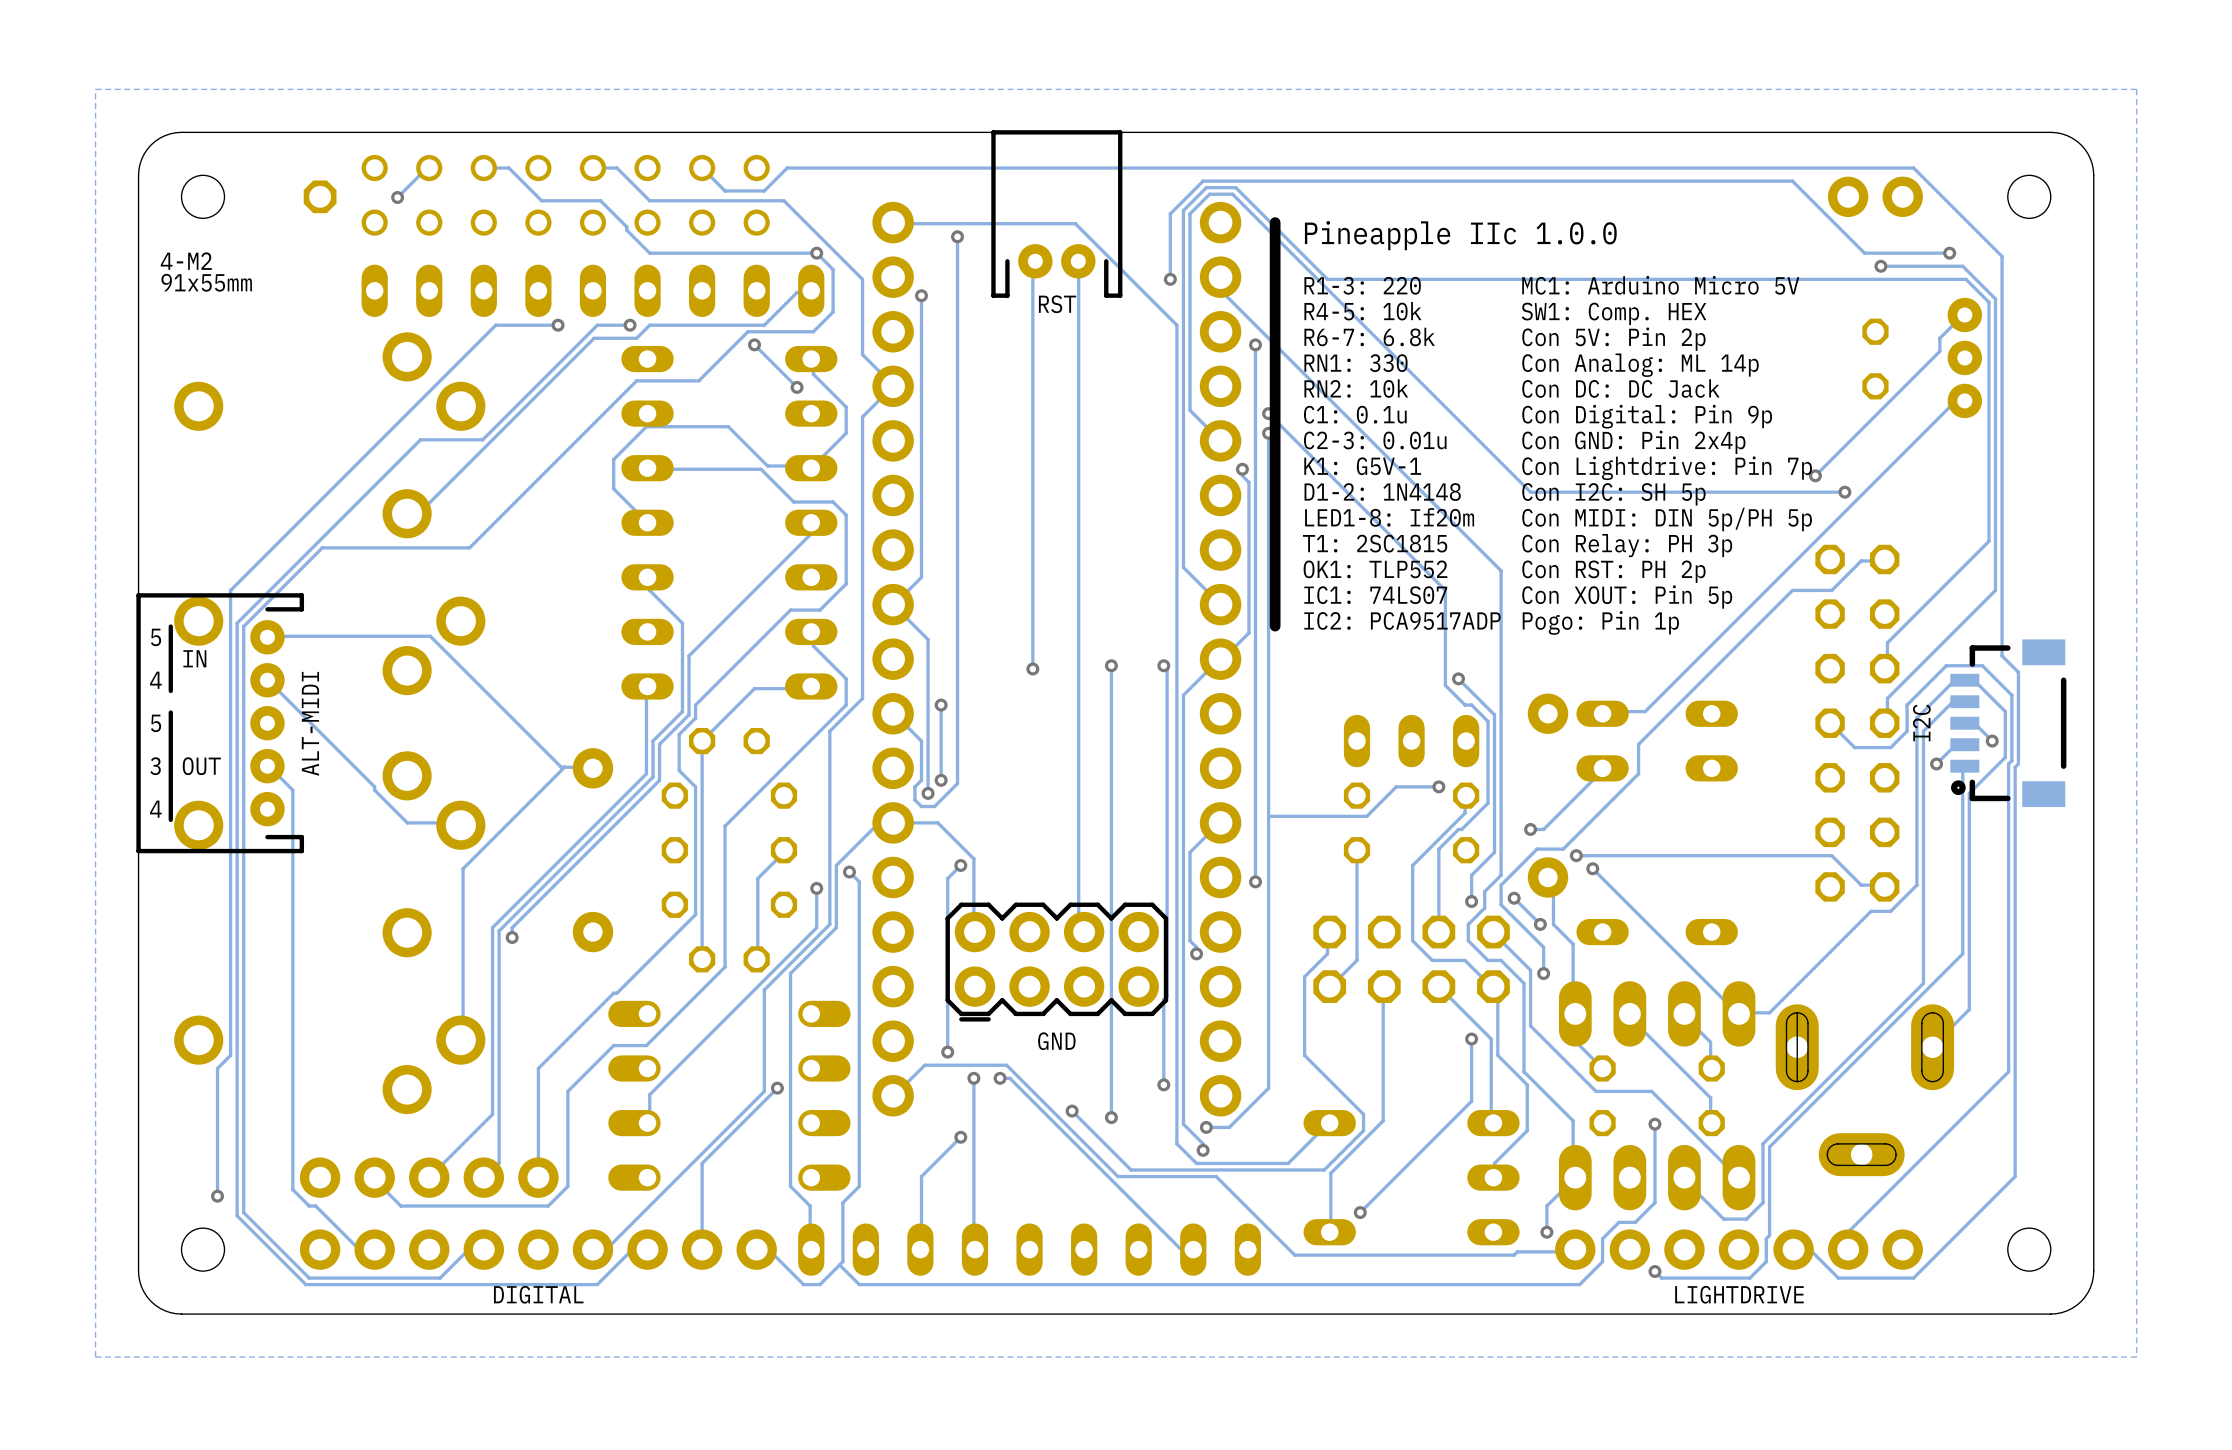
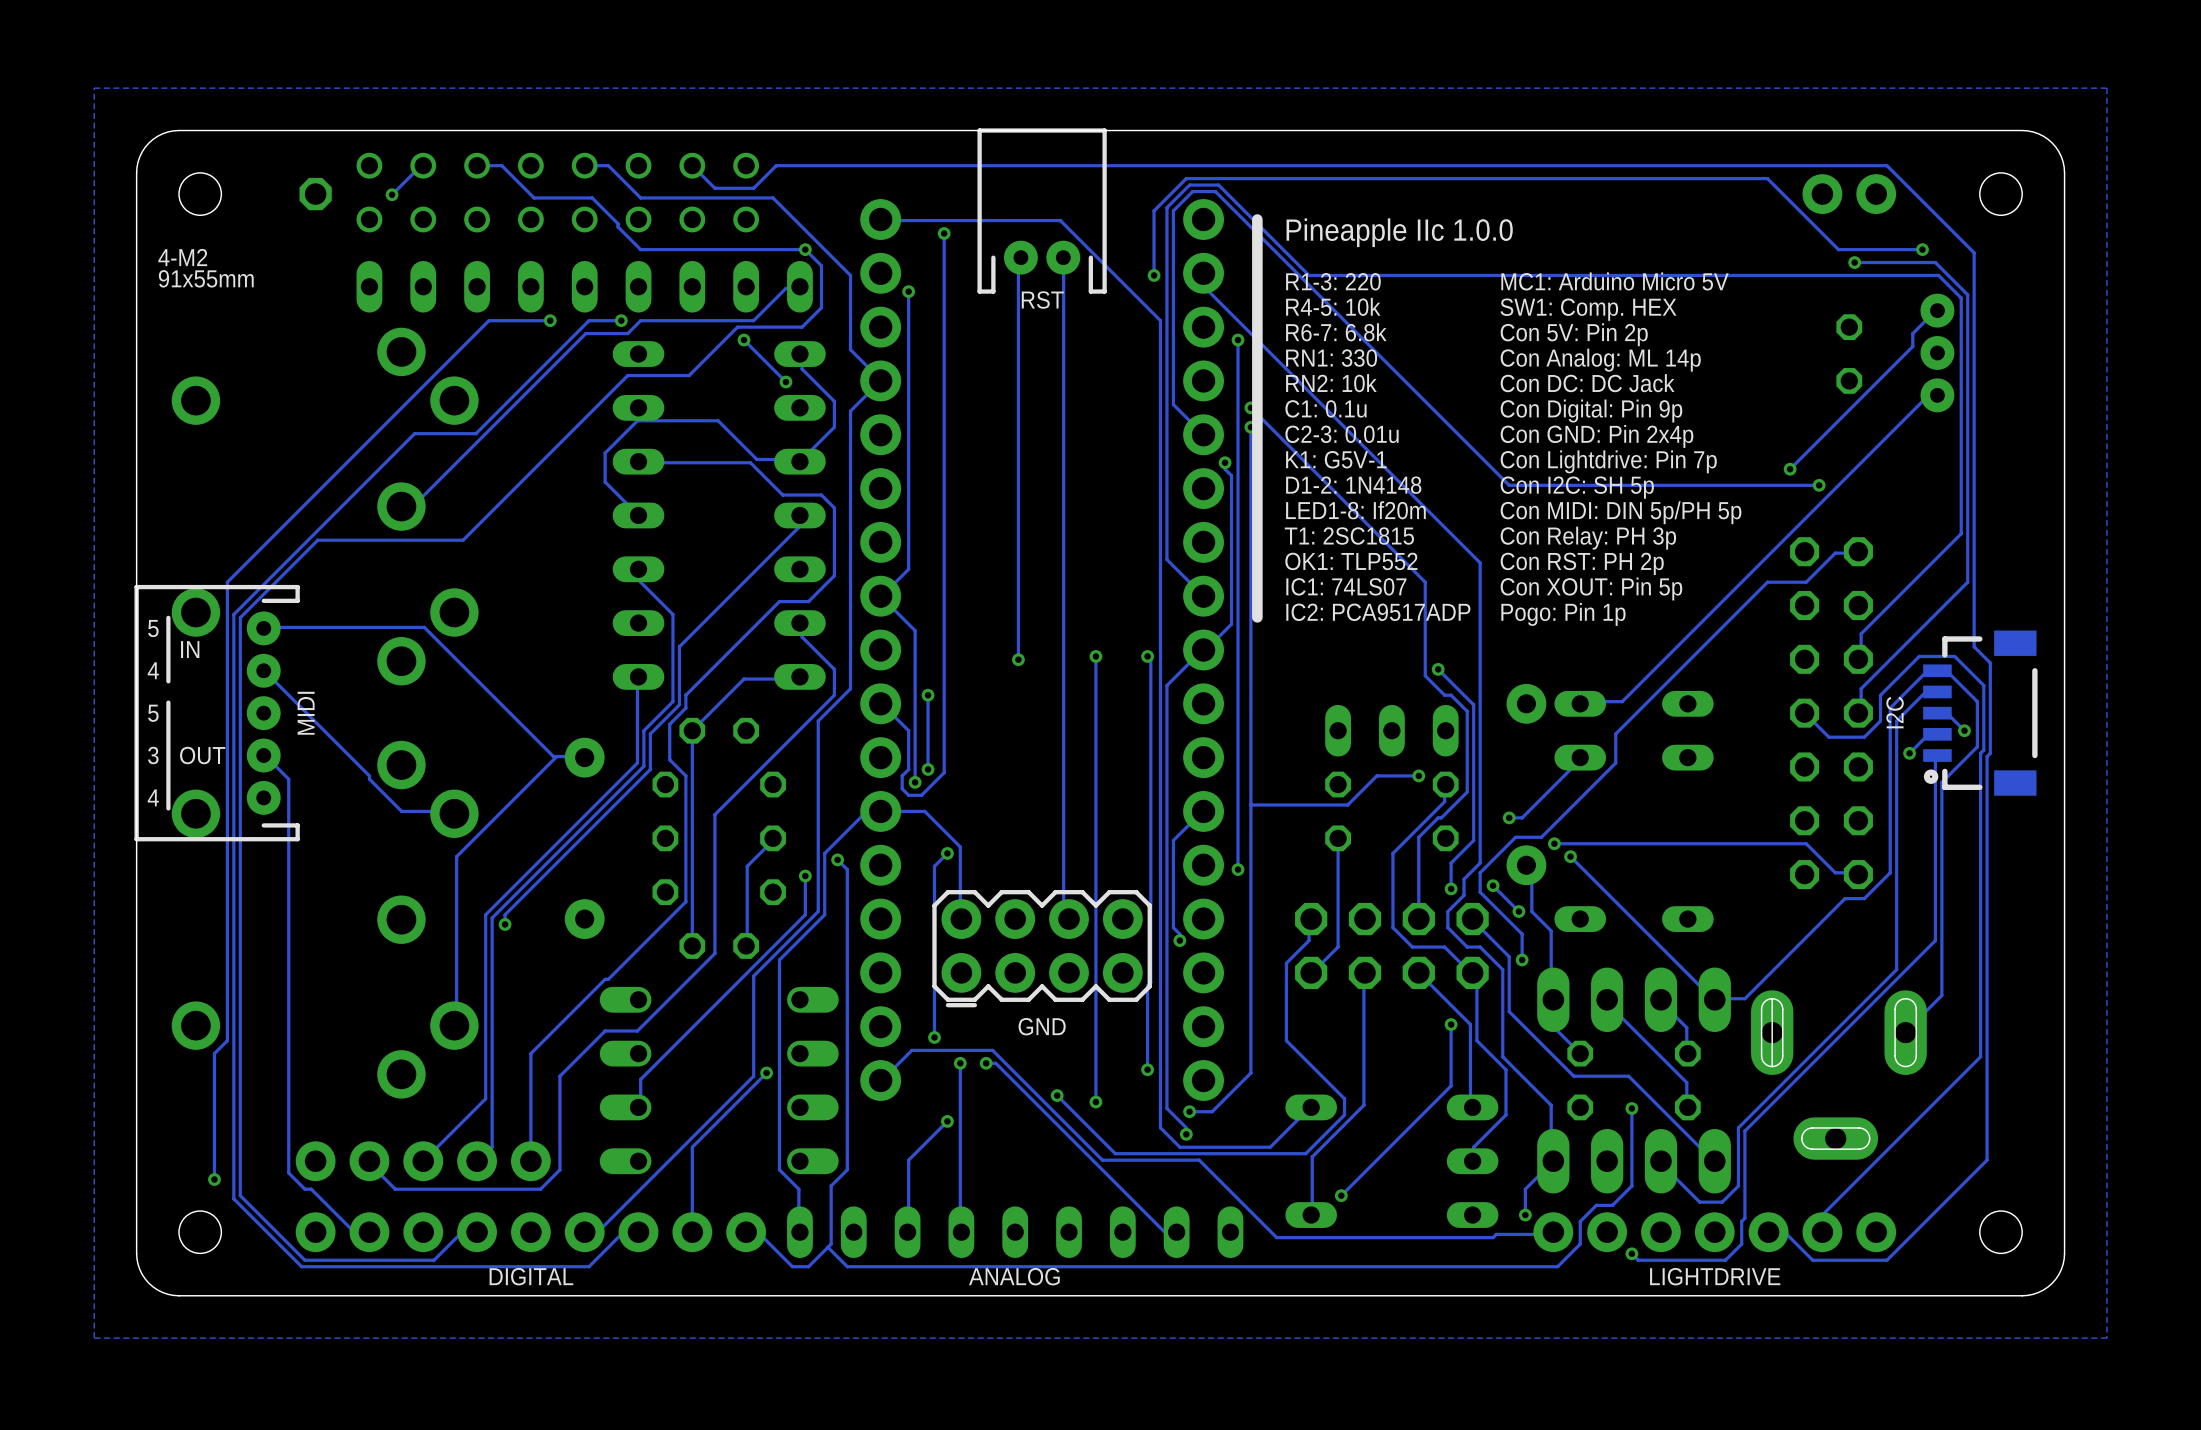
ALT-MIDI name: ALT-MIDI (310, 723) -> MIDI (306, 713)
text: none -> ANALOG (1014, 1276)

